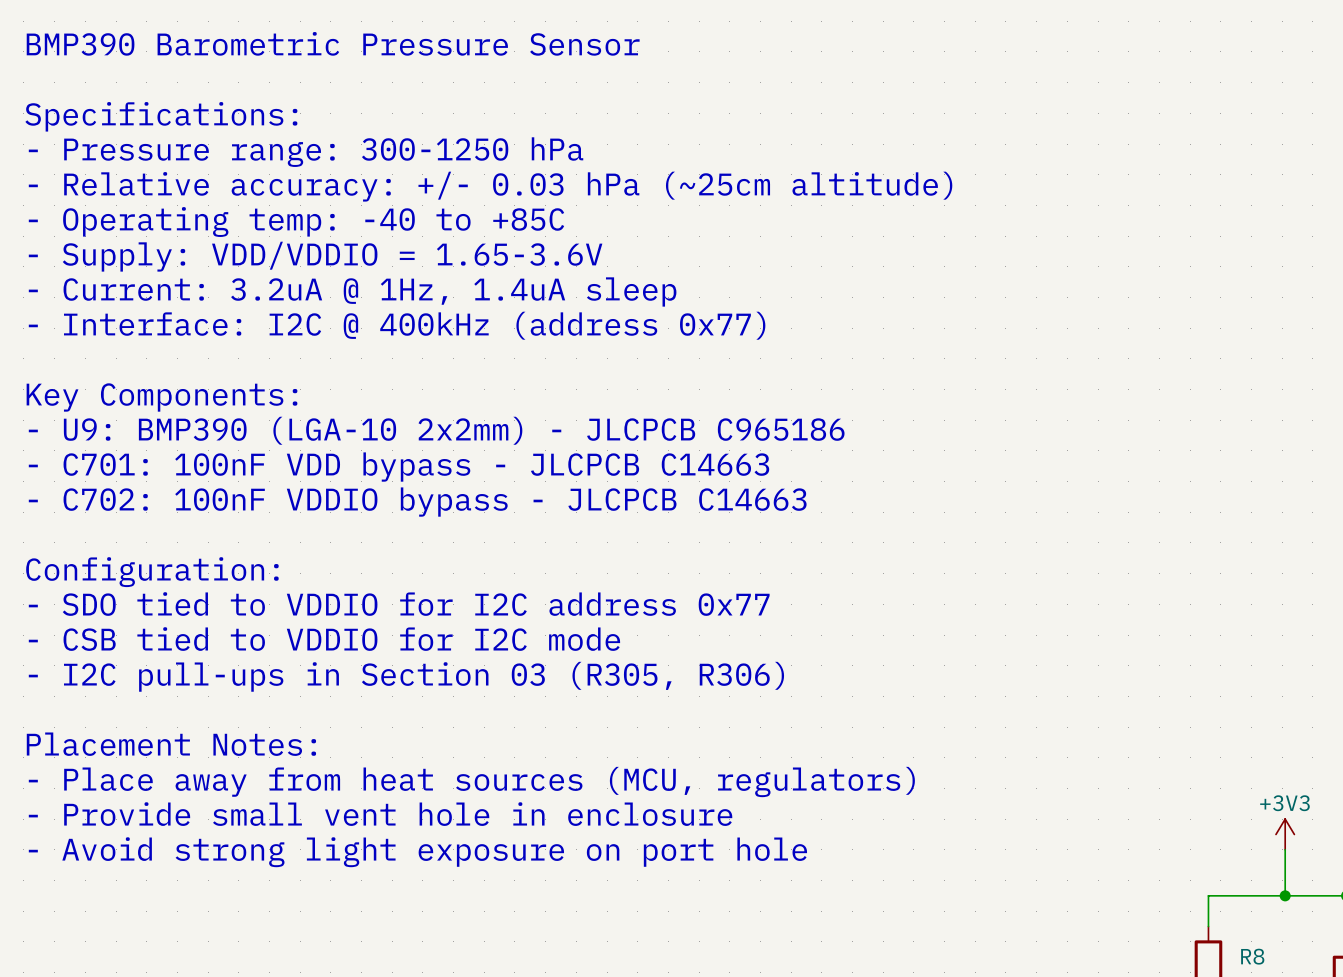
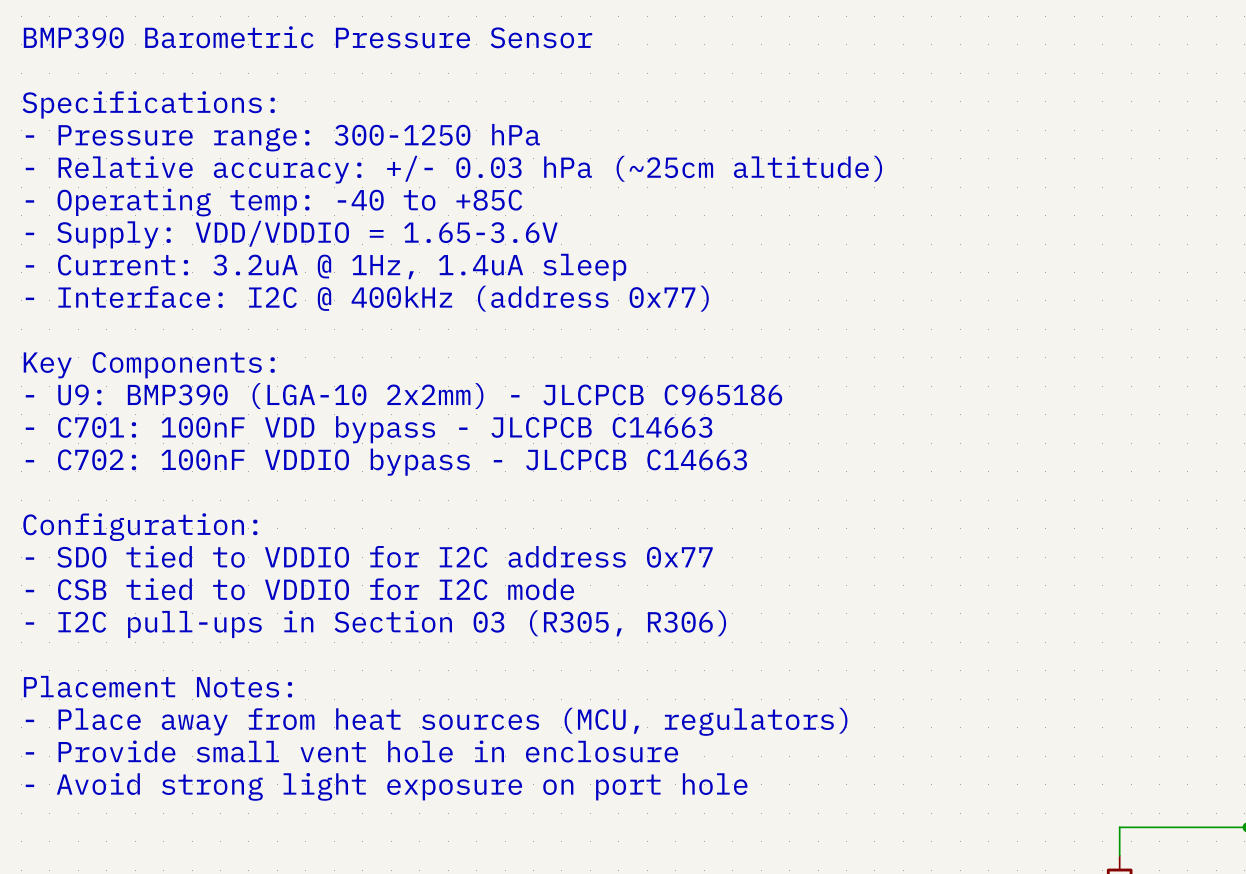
power symbol: +3V3 (1285, 834) -> none
wire: (1285, 849) (1285, 895) -> none
junction: (1285, 895) -> none

